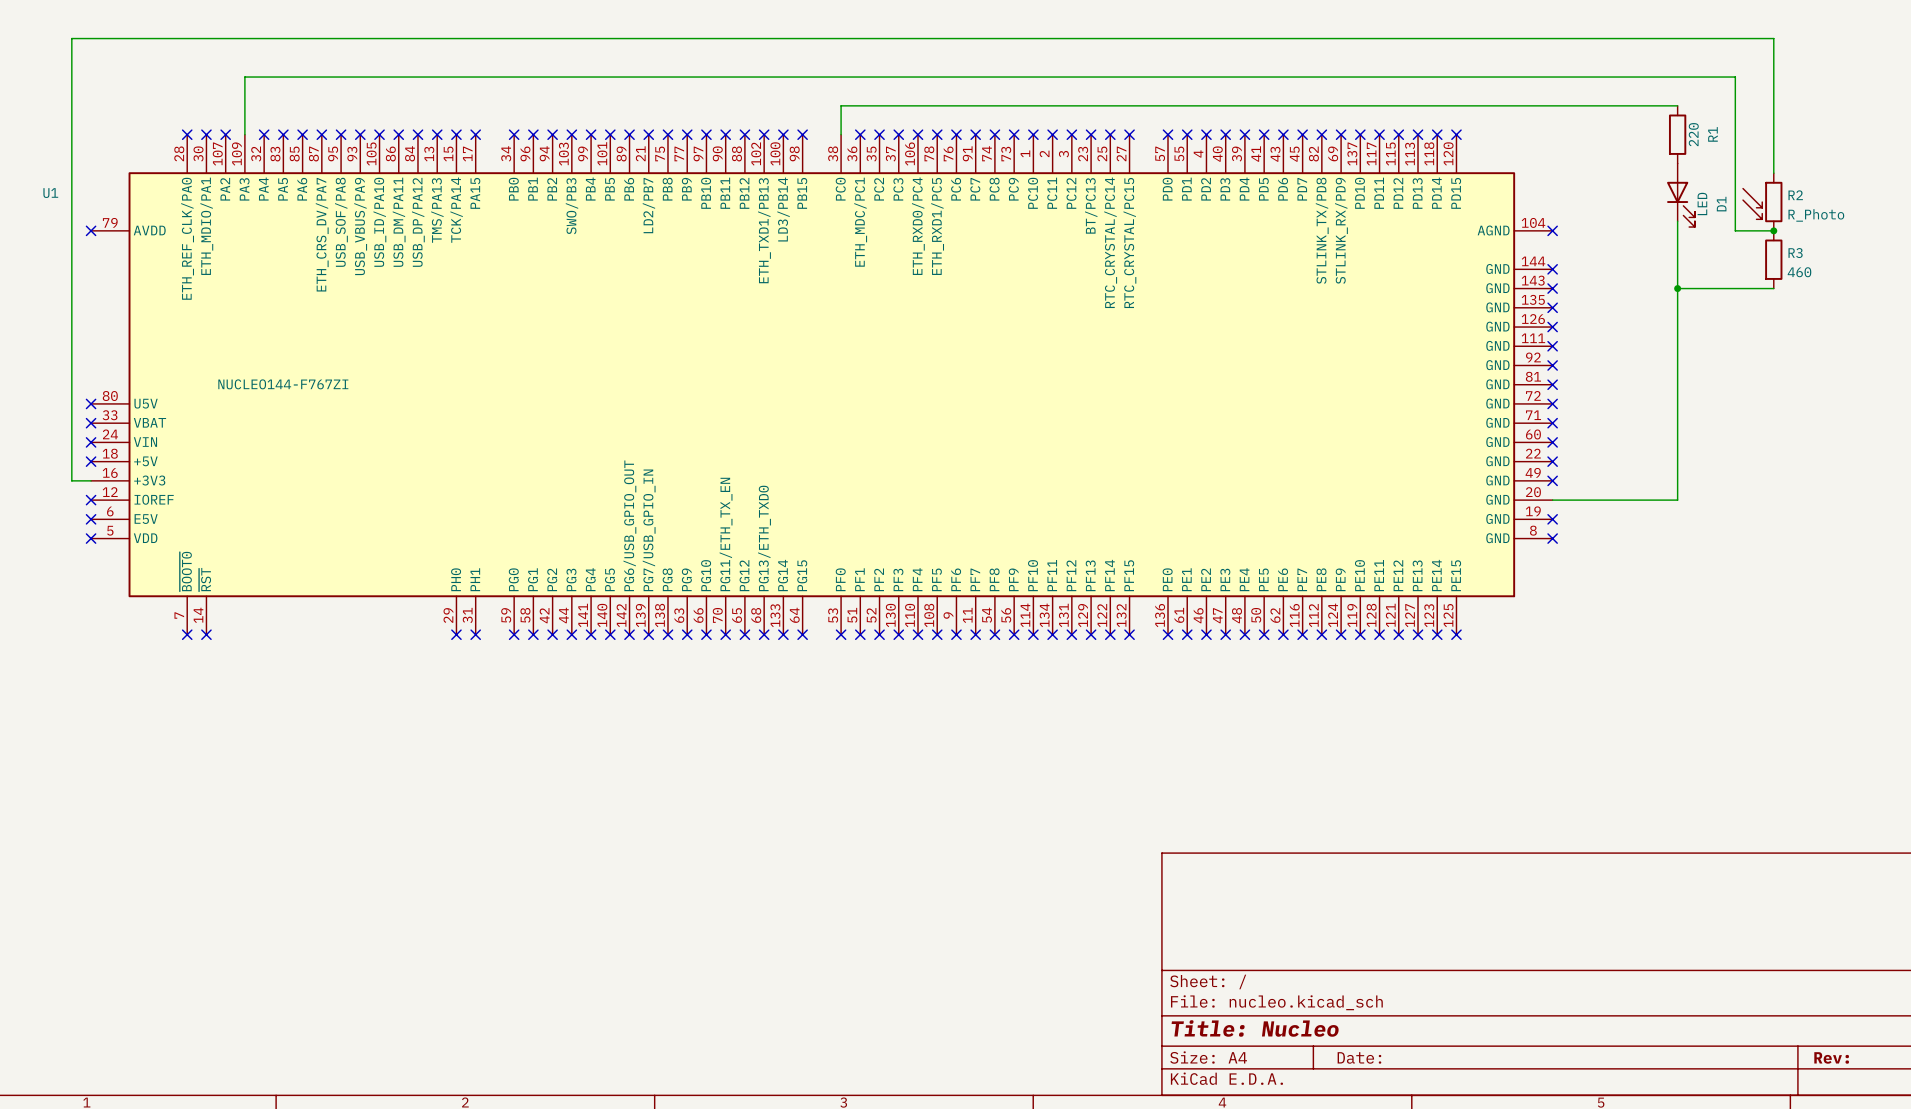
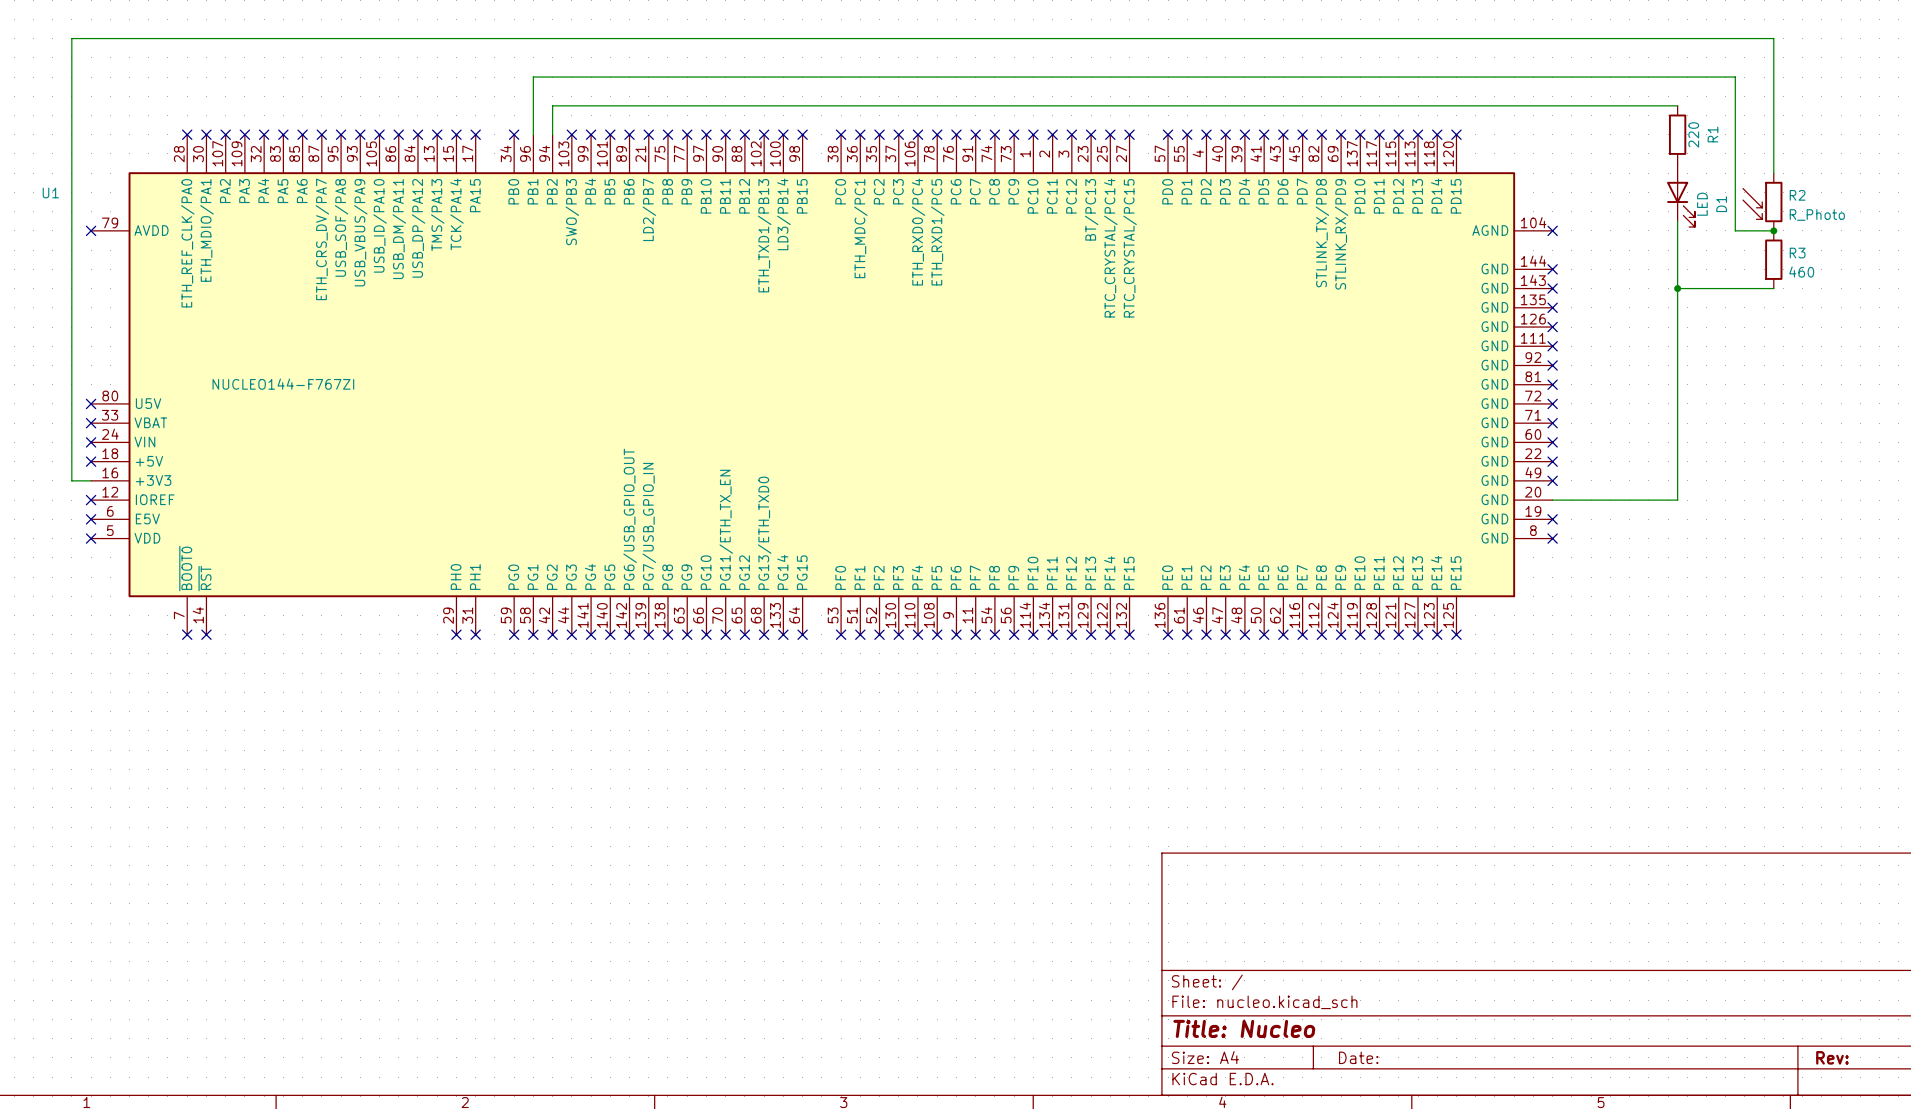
wire: (533, 77) (244, 77) (244, 134) -> (533, 77) (533, 134)
wire: (841, 105) (841, 134) -> (841, 105) (552, 105) (552, 134)
no-connect mark: none -> (244, 134)
no-connect mark: (533, 134) -> none
no-connect mark: (552, 134) -> none
no-connect mark: none -> (841, 134)

